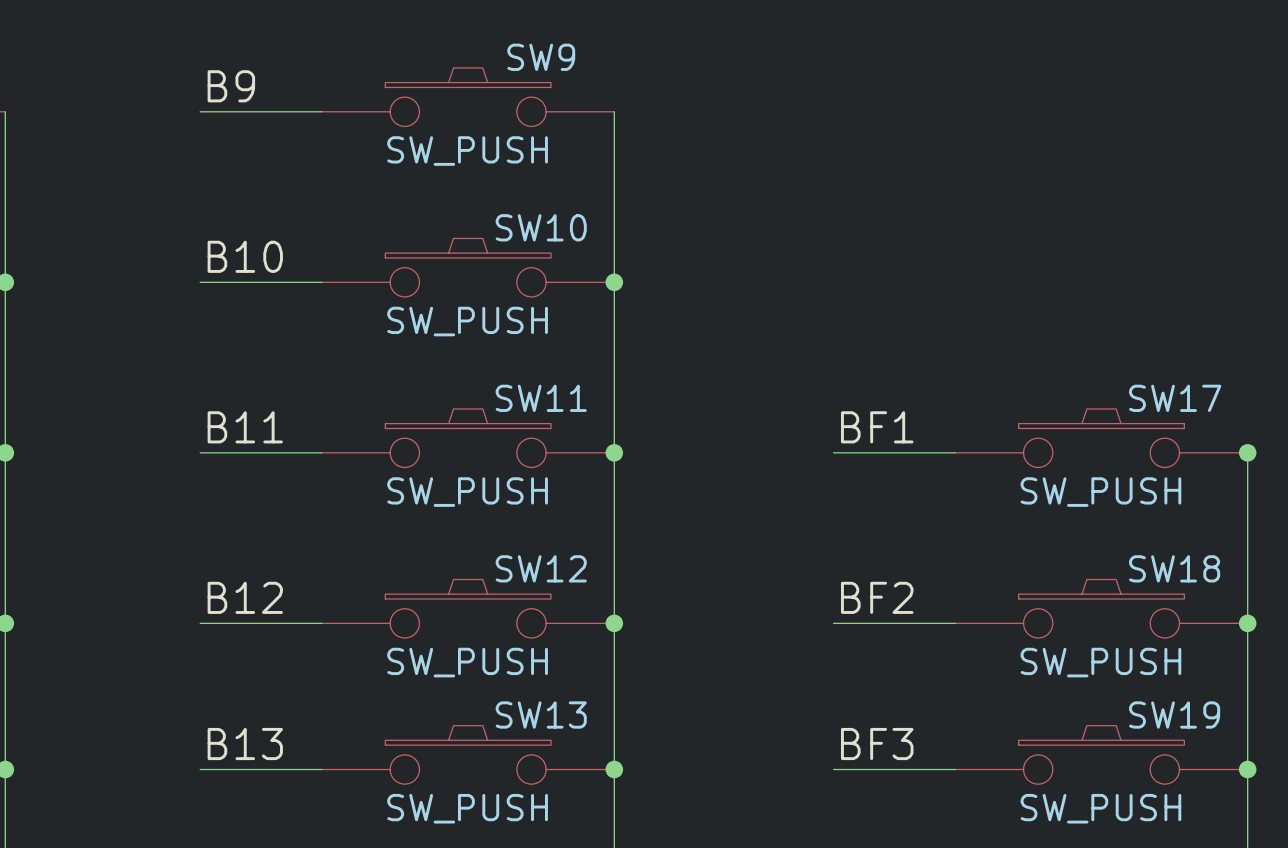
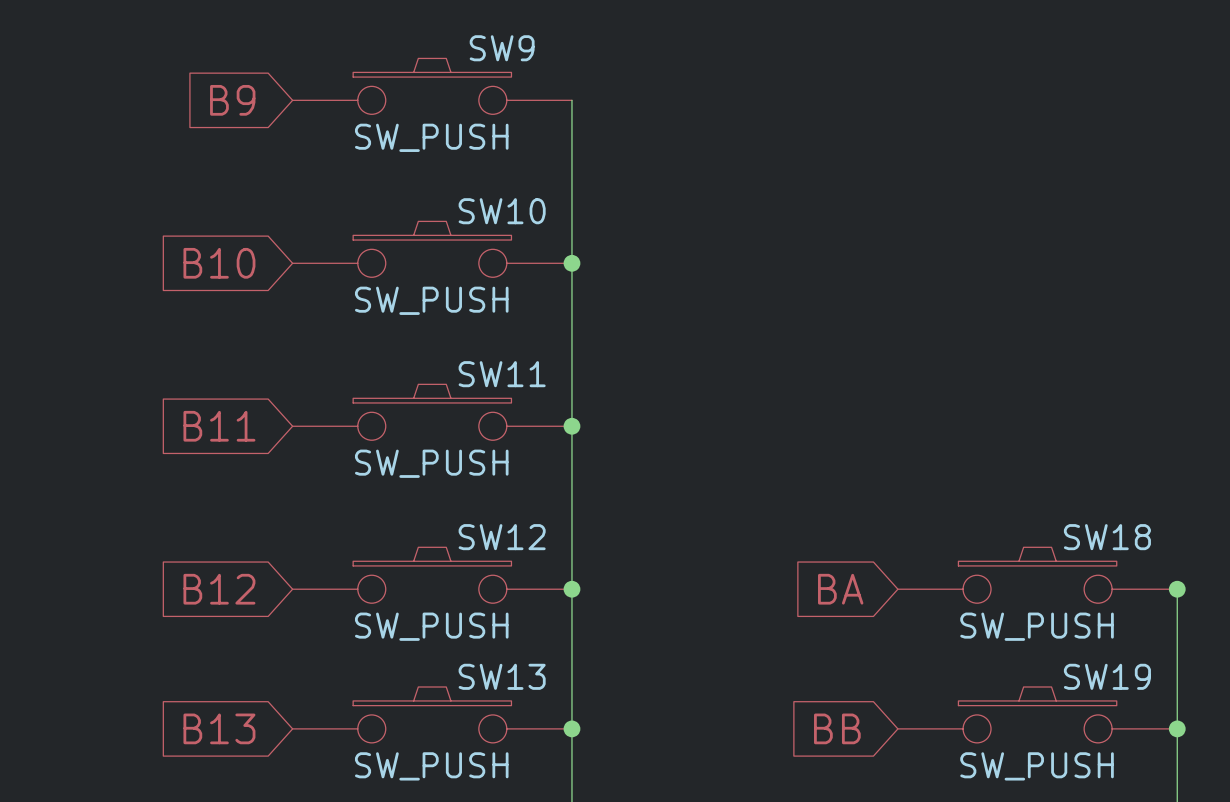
label: B9 (231, 86) -> none
wire: (200, 111) (321, 111) -> none
global label: none -> B9 (232, 100)
label: B10 (245, 256) -> none
wire: (200, 282) (321, 282) -> none
global label: none -> B10 (219, 263)
label: B11 (245, 427) -> none
label: BF1 (877, 427) -> none
SW17: SW_PUSH (1101, 438) -> none
wire: (200, 452) (321, 452) -> none
global label: none -> B11 (219, 426)
wire: (833, 452) (955, 452) -> none
wire: (1247, 452) (1247, 623) -> none
junction: (1247, 452) -> none
label: B12 (245, 597) -> none
label: BF2 (877, 597) -> none
wire: (200, 623) (321, 623) -> none
global label: none -> B12 (219, 589)
wire: (833, 623) (955, 623) -> none
global label: none -> BA (840, 589)
label: B13 (245, 744) -> none
label: BF3 (877, 744) -> none
wire: (200, 769) (321, 769) -> none
global label: none -> B13 (219, 728)
wire: (833, 769) (955, 769) -> none
global label: none -> BB (837, 728)

